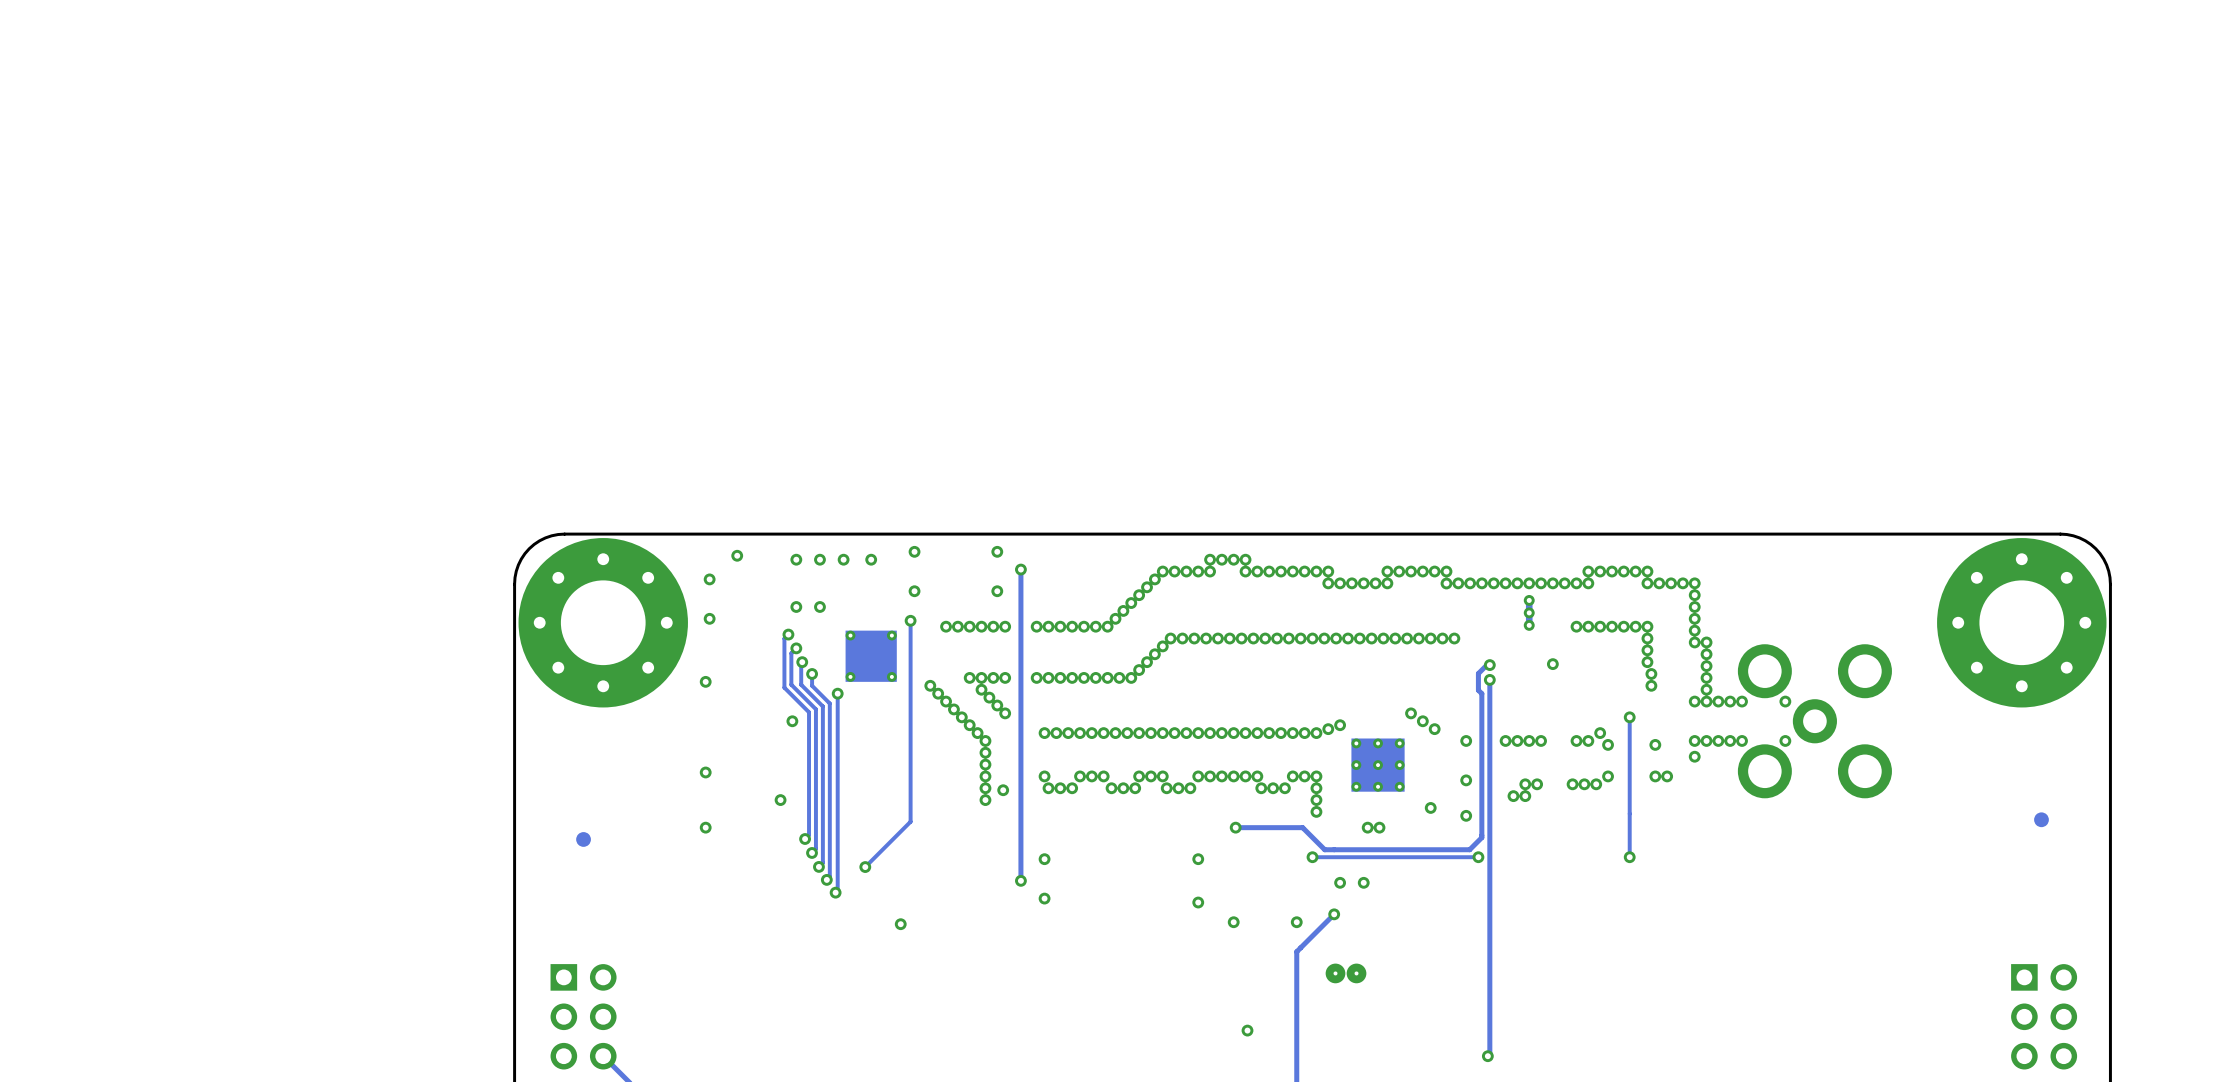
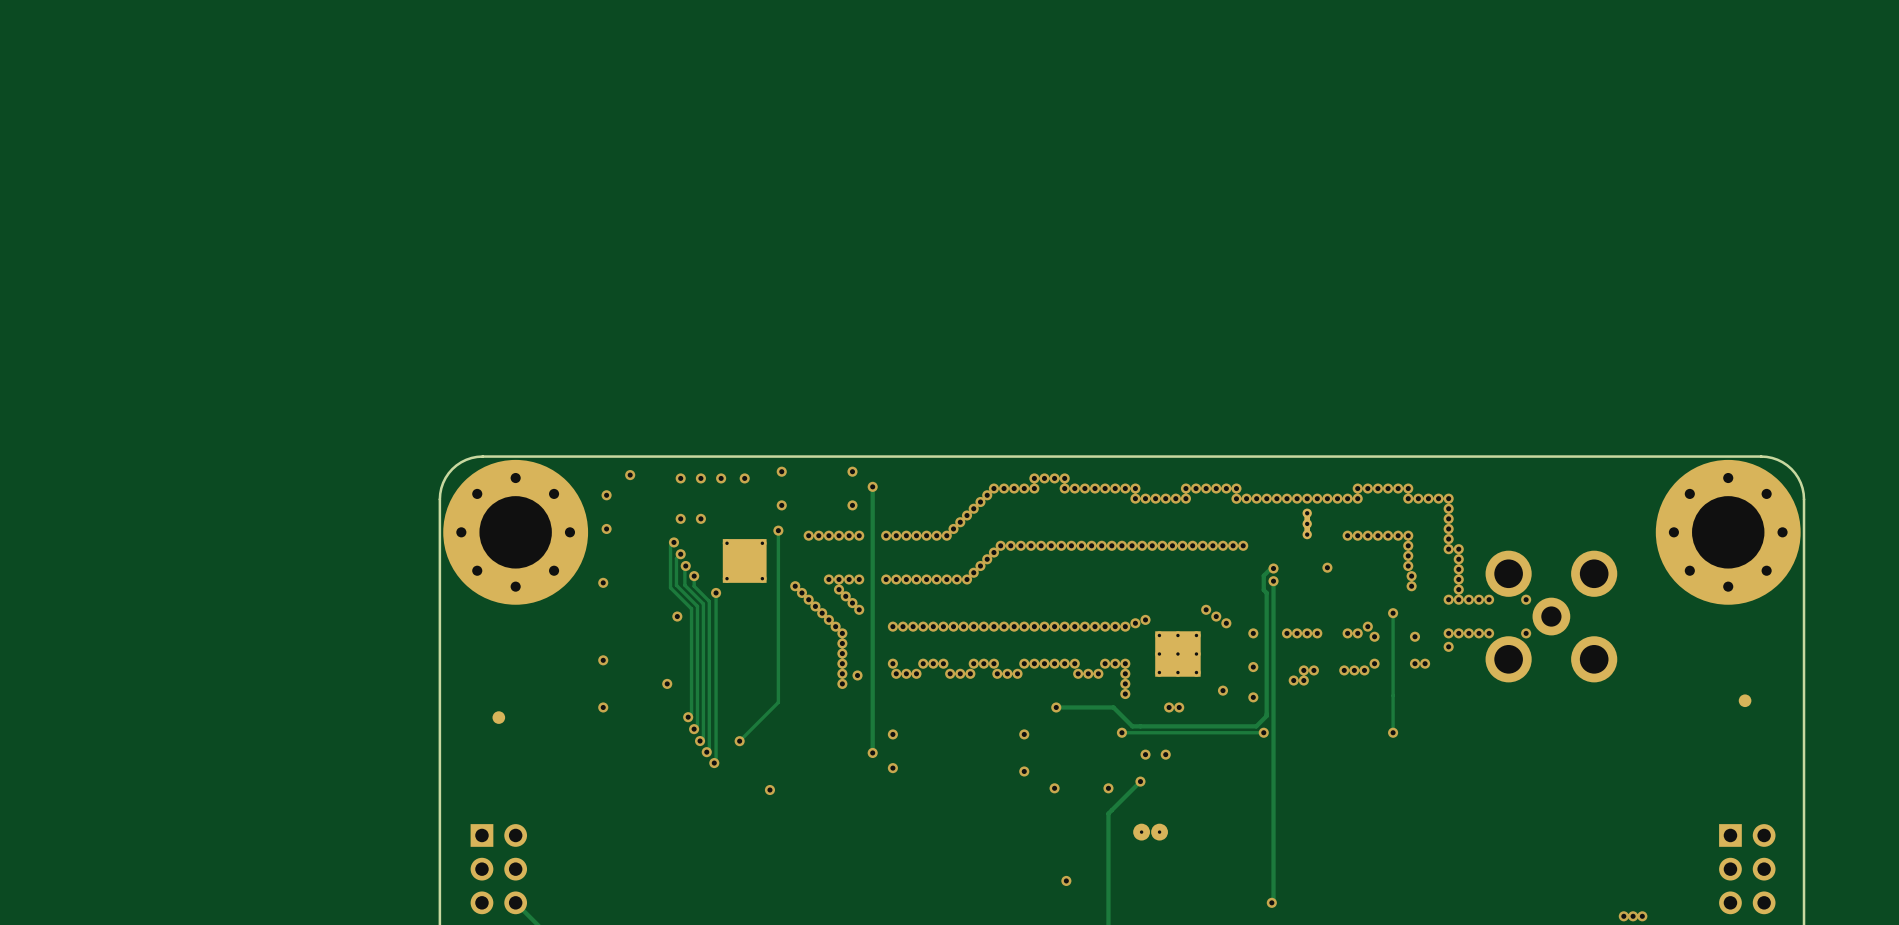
via: none -> (1623, 916)
via: none -> (1633, 916)
via: none -> (1642, 916)

